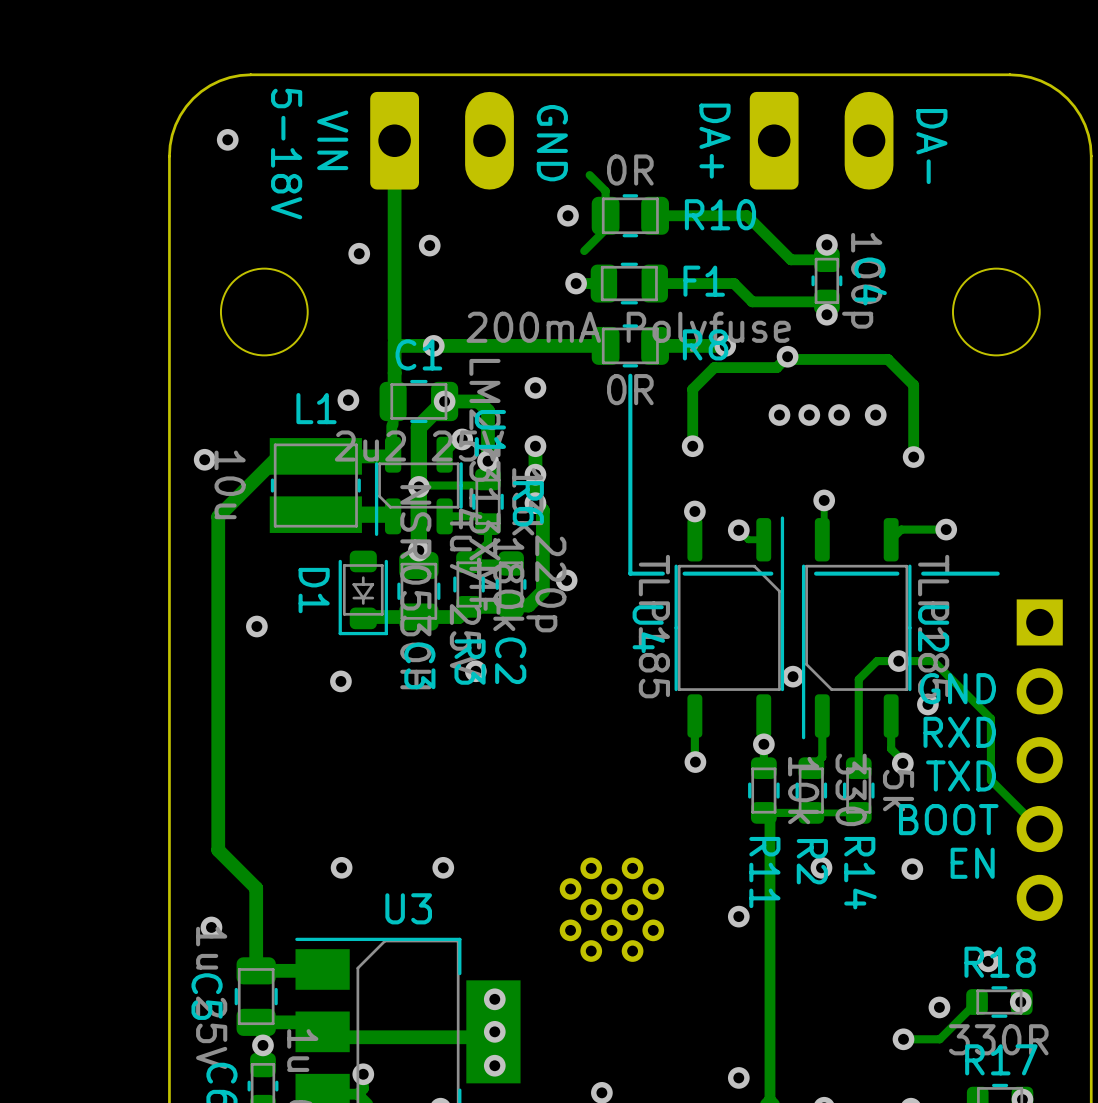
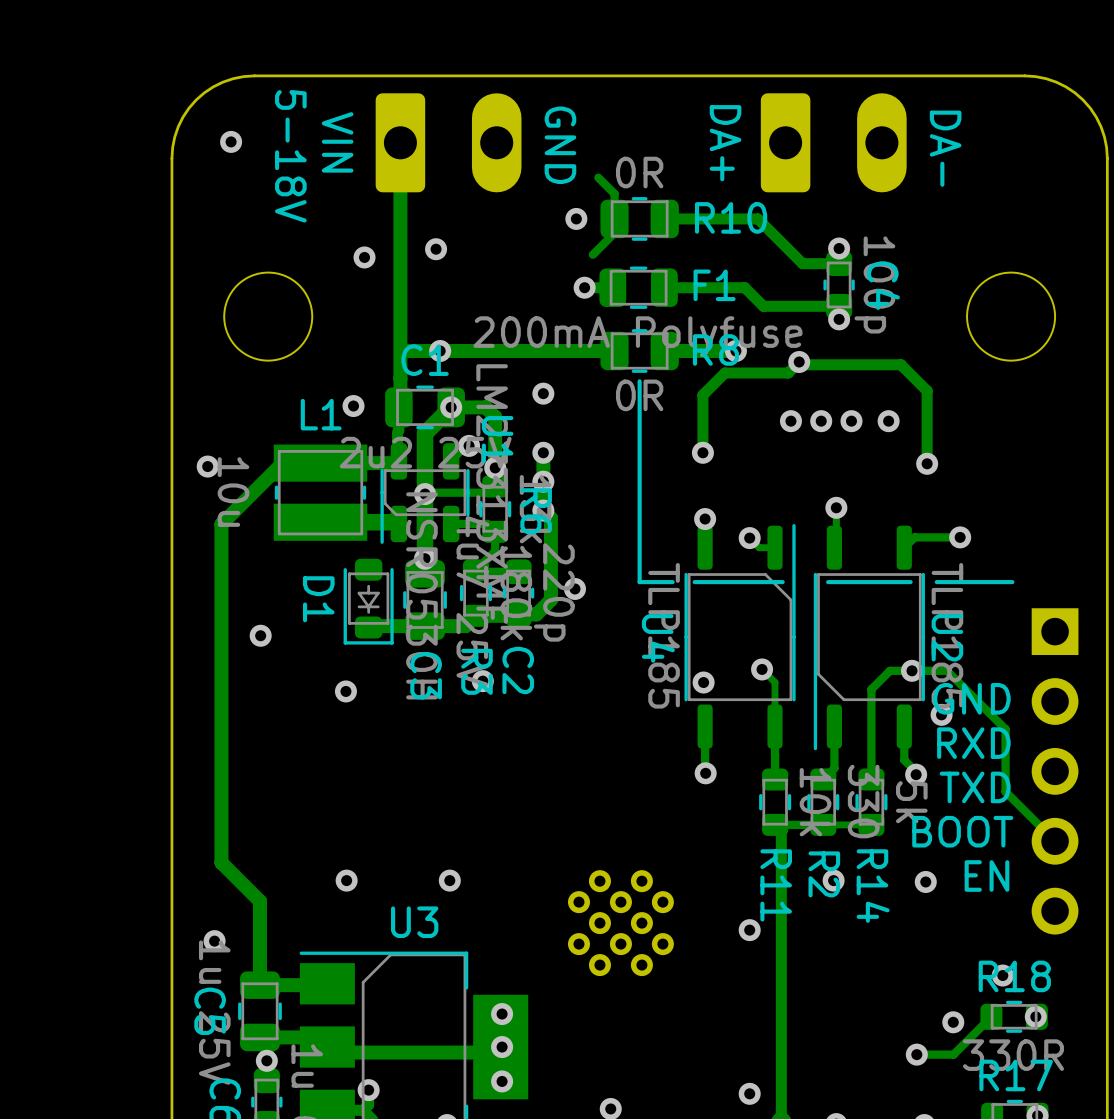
track: none -> (762, 669) (775, 682) (775, 726)
via: none -> (762, 669)
via: none -> (703, 682)
via: (793, 676) -> none
via: (763, 744) -> none

